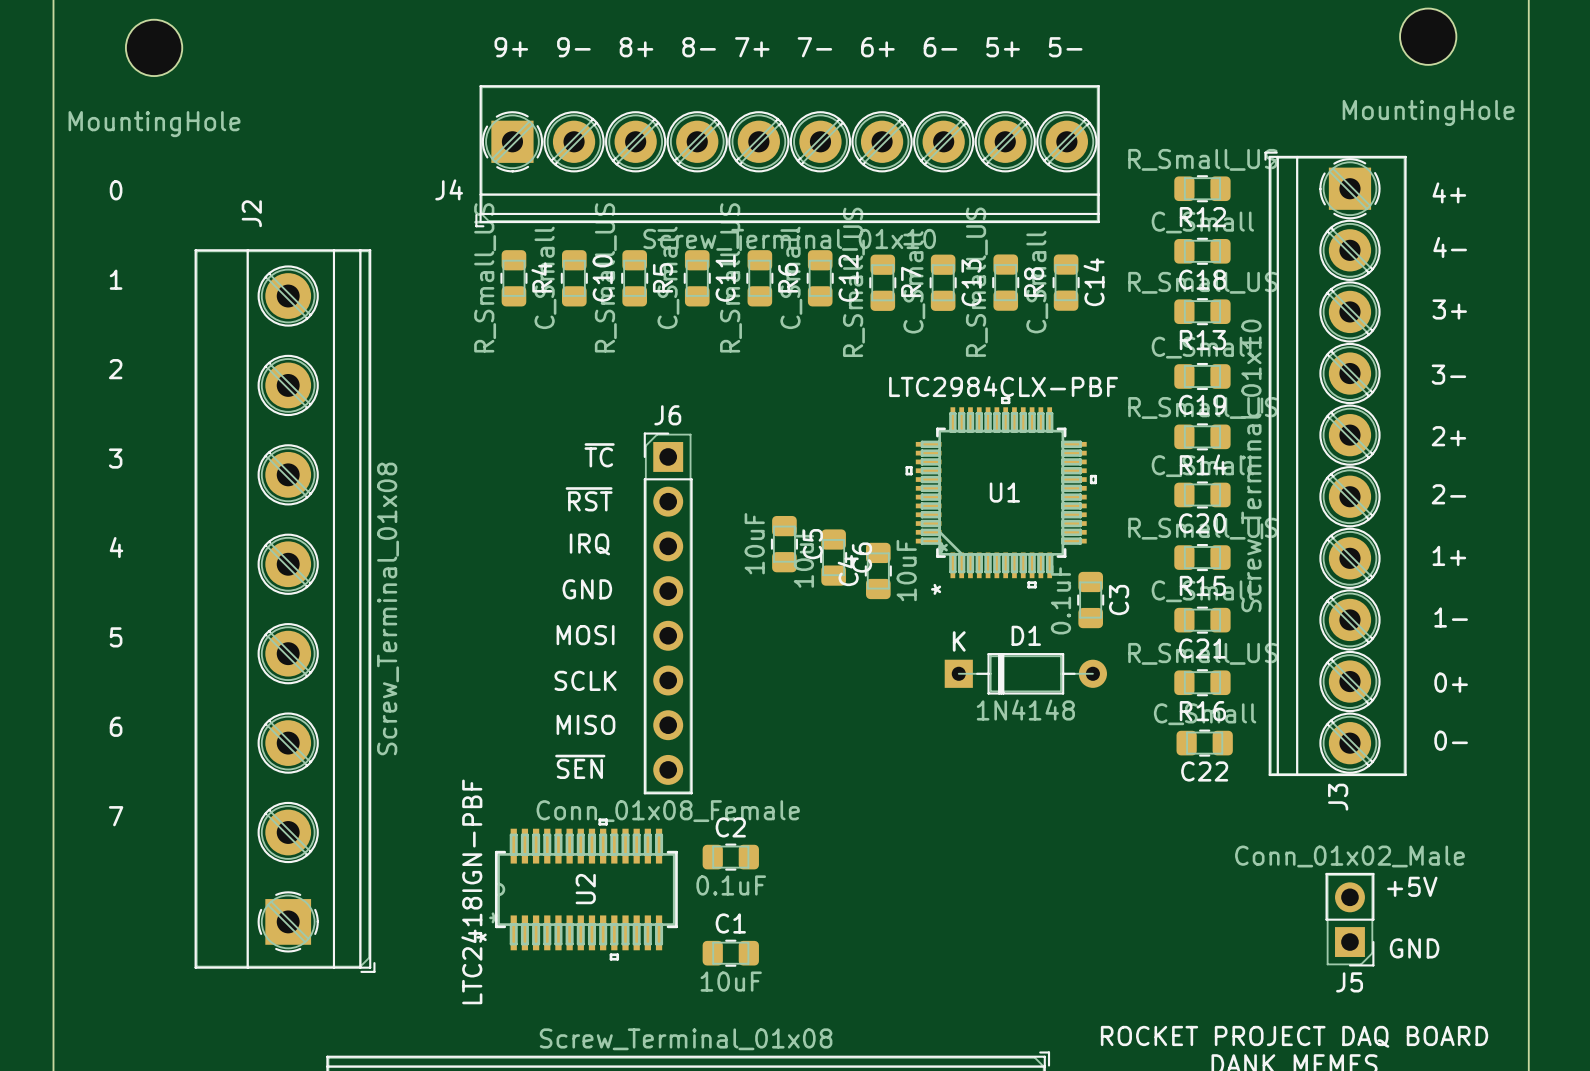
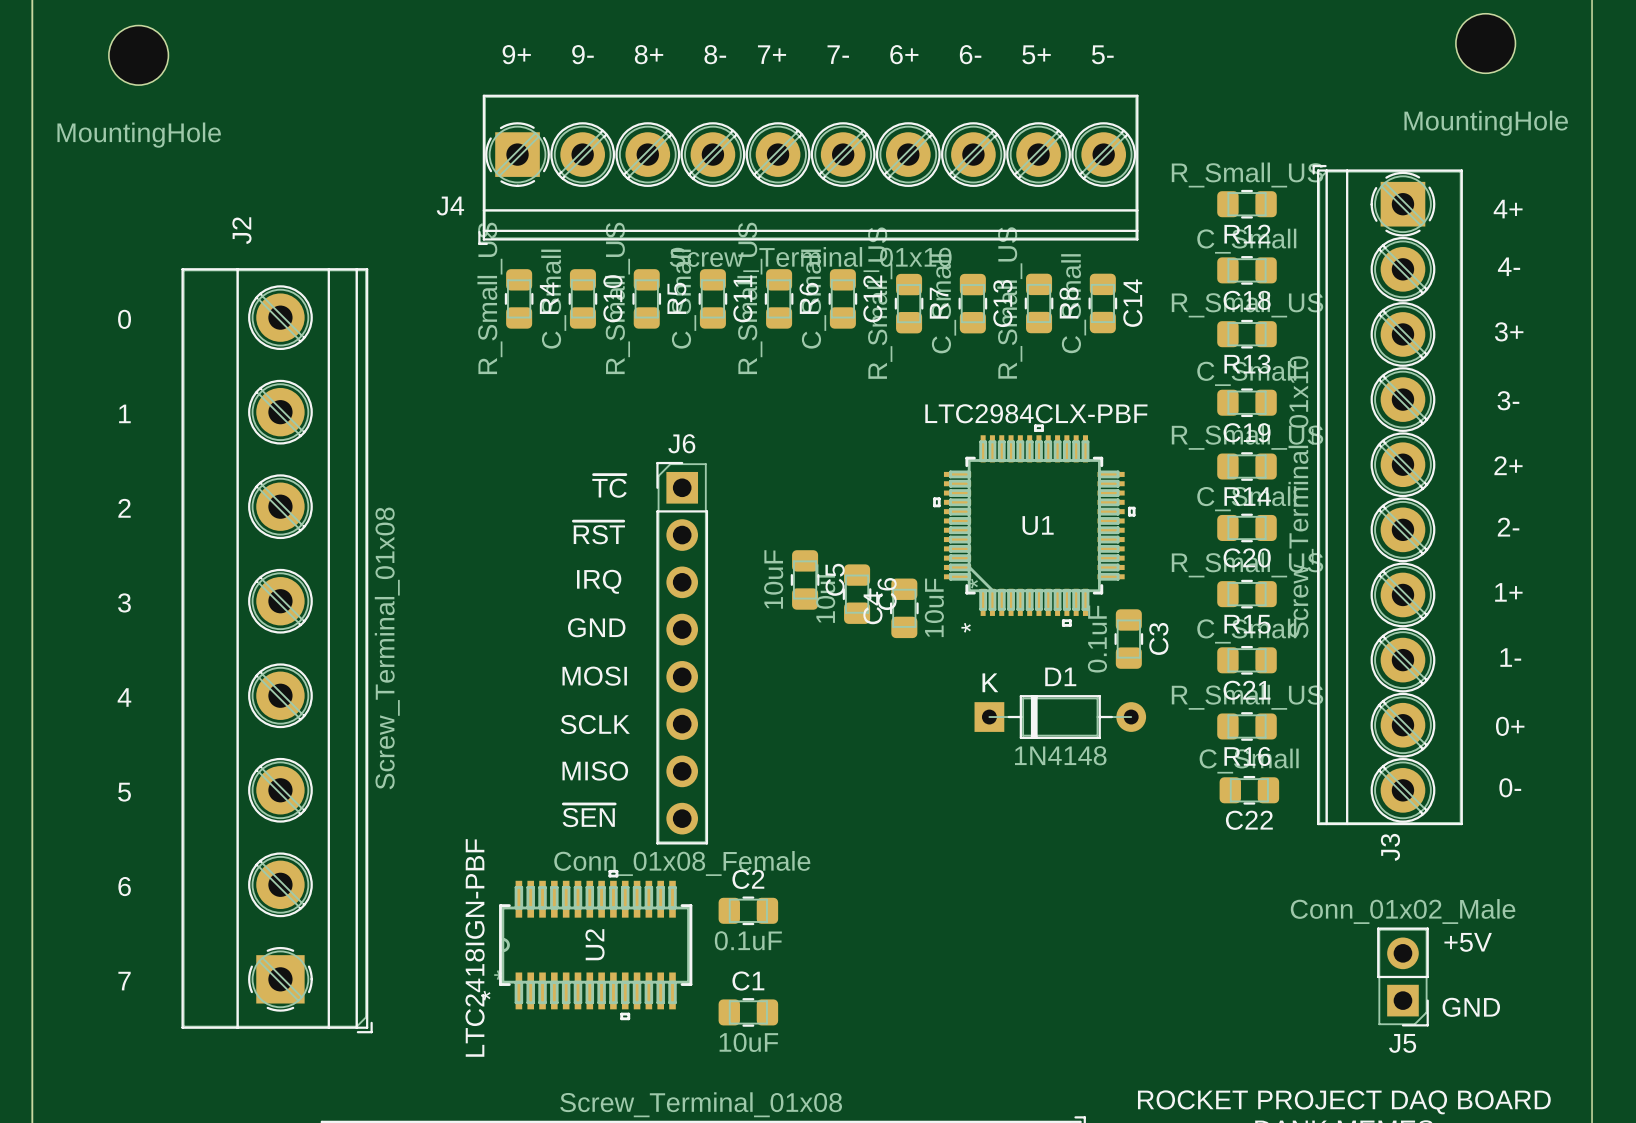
text position: 0 (116, 190) -> 0 (124, 319)
text position: 1 (116, 279) -> 1 (124, 413)
text position: 2 (115, 369) -> 2 (124, 508)
text position: 3 (115, 458) -> 3 (124, 602)
text position: 4 (116, 547) -> 4 (124, 697)
text position: 5 (116, 637) -> 5 (124, 792)
text position: 6 (116, 726) -> 6 (124, 886)
text position: 7 (116, 816) -> 7 (124, 981)

